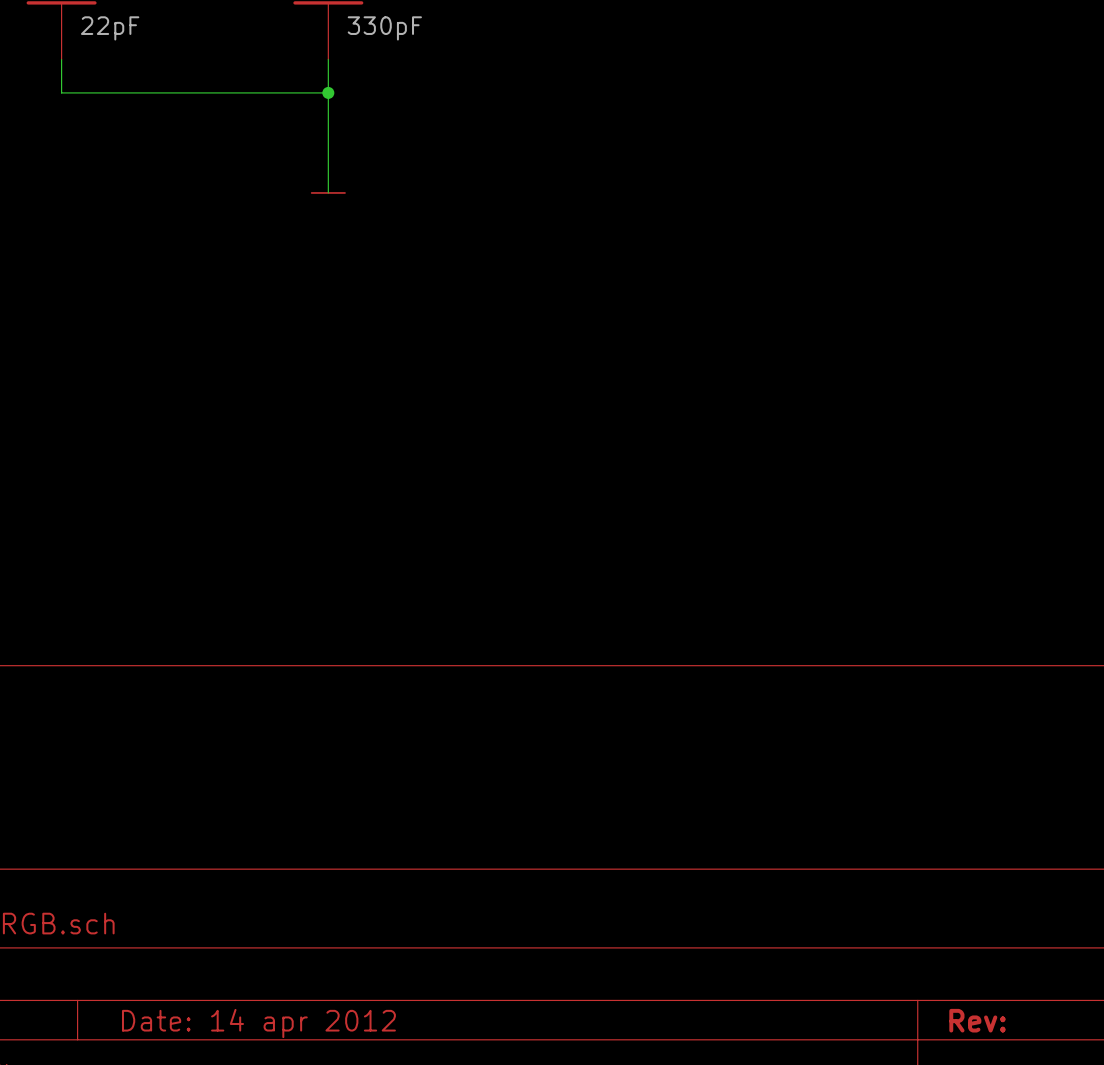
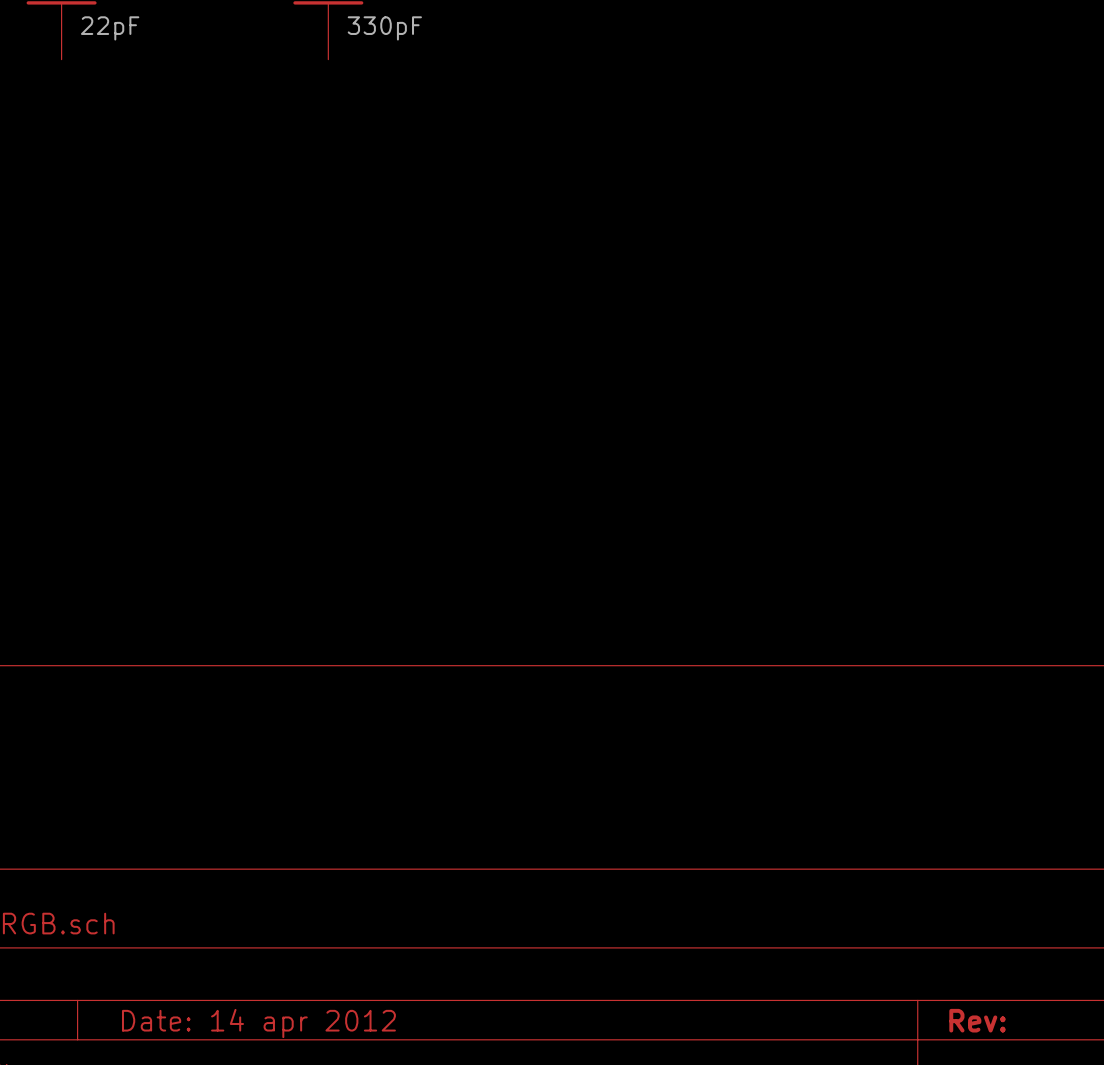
wire: (61, 59) (61, 92) (328, 92) -> none
wire: (328, 59) (328, 192) -> none
junction: (328, 92) -> none
power symbol: (328, 192) -> none

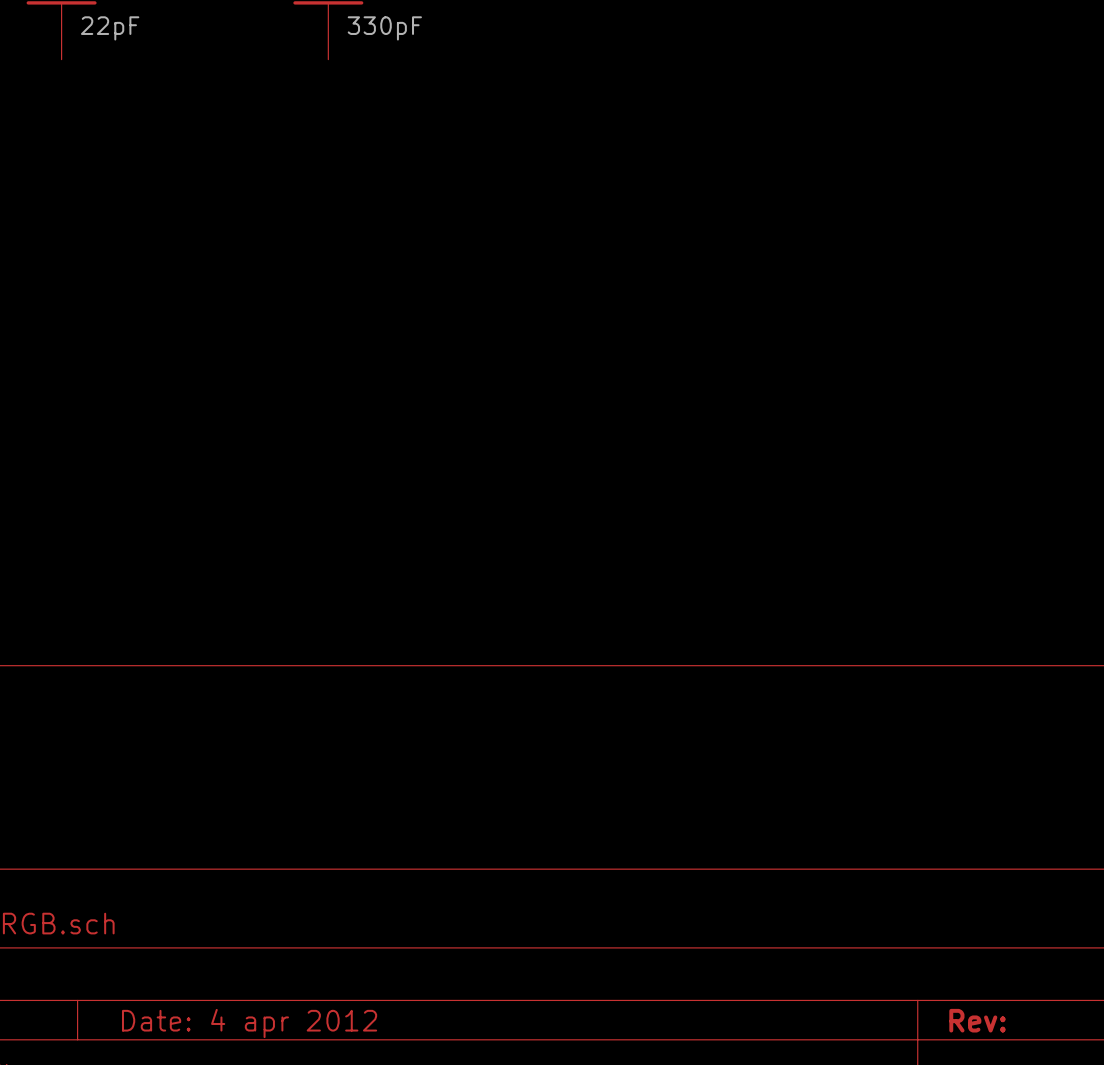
title block: Date: 14 apr 2012 (258, 1023) -> Date: 4 apr 2012 (249, 1023)

